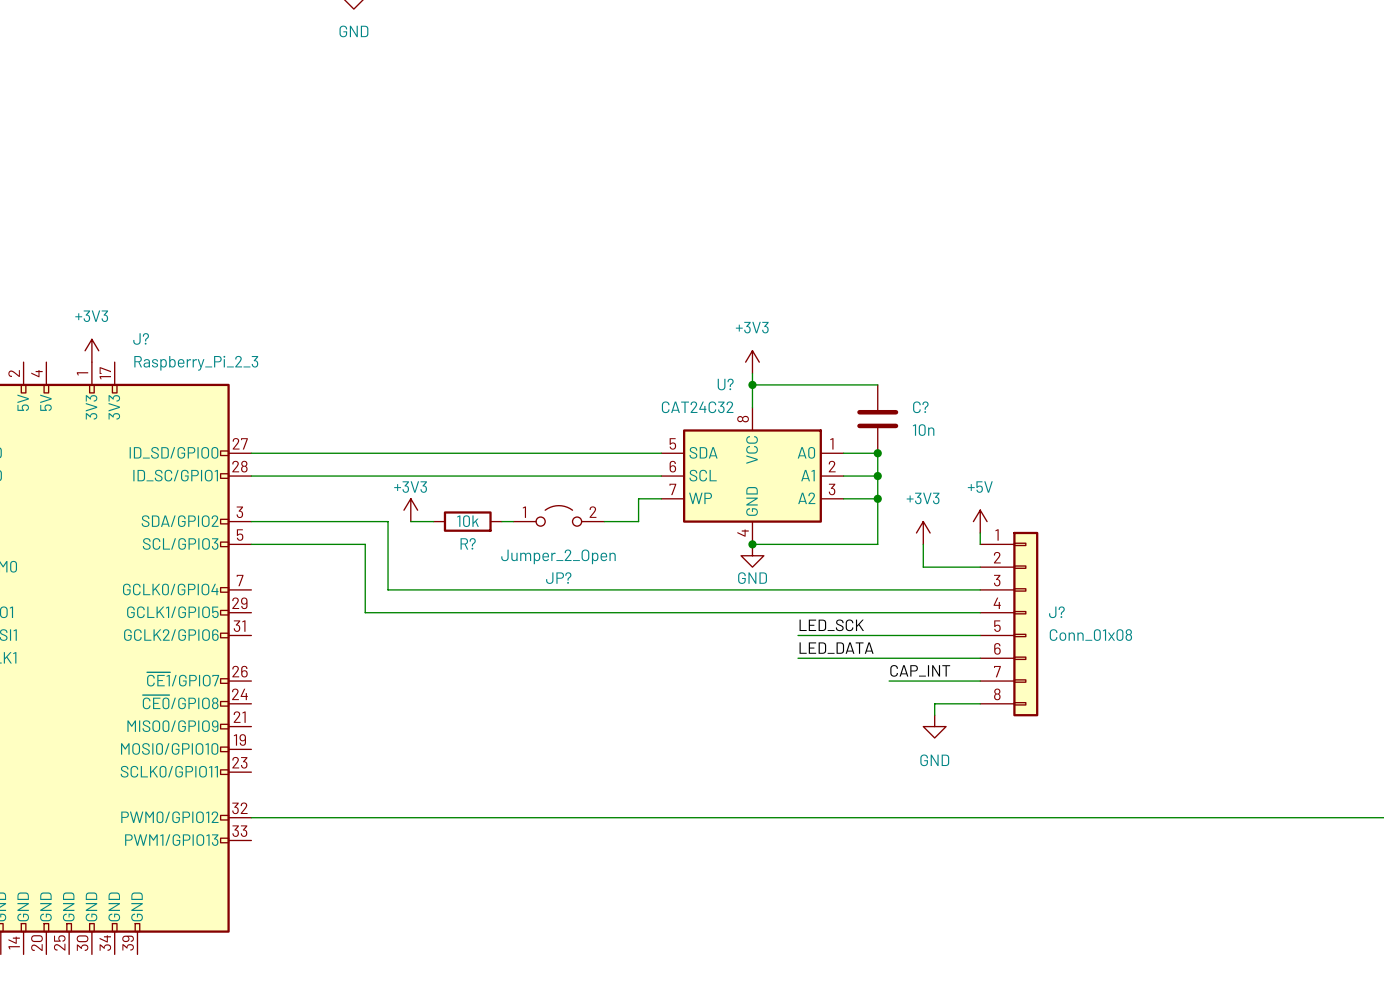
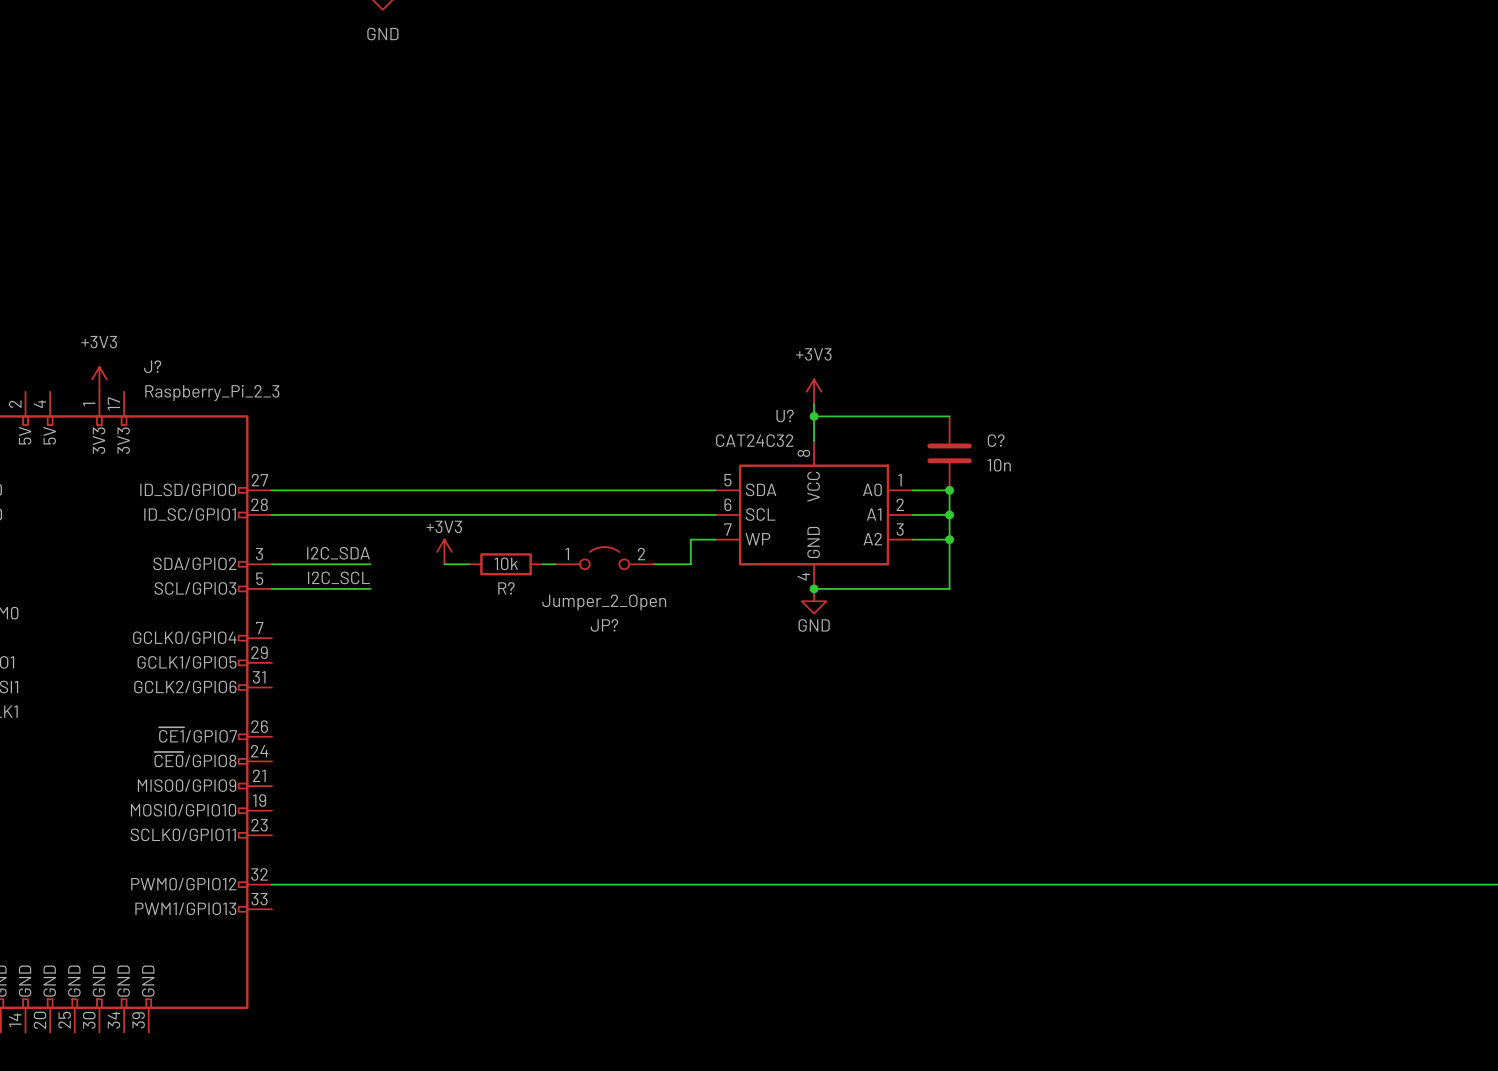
label: none -> I2C_SDA (338, 553)
wire: (342, 521) (388, 521) (388, 589) (980, 589) -> none
power symbol: +5V (980, 521) -> none
power symbol: +3V3 (923, 532) -> none
wire: (980, 532) (980, 544) -> none
label: none -> I2C_SCL (338, 577)
wire: (342, 544) (365, 544) (365, 612) (980, 612) -> none
wire: (923, 544) (923, 567) (980, 567) -> none
J?: Conn_01x08 (1009, 624) -> none
label: LED_SCK (831, 625) -> none
wire: (798, 635) (980, 635) -> none
label: LED_DATA (836, 648) -> none
wire: (798, 658) (980, 658) -> none
label: CAP_INT (920, 670) -> none
wire: (889, 681) (980, 681) -> none
wire: (980, 703) (934, 703) (934, 715) -> none
power symbol: GND (934, 726) -> none

